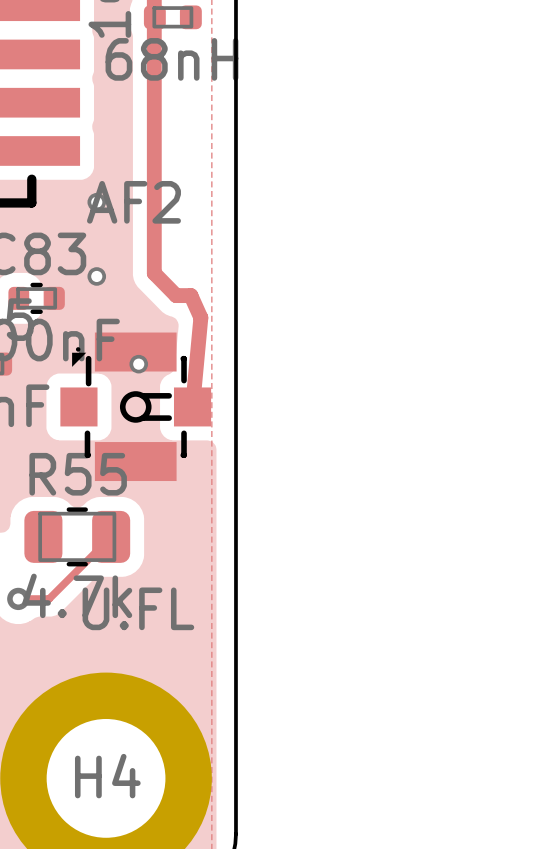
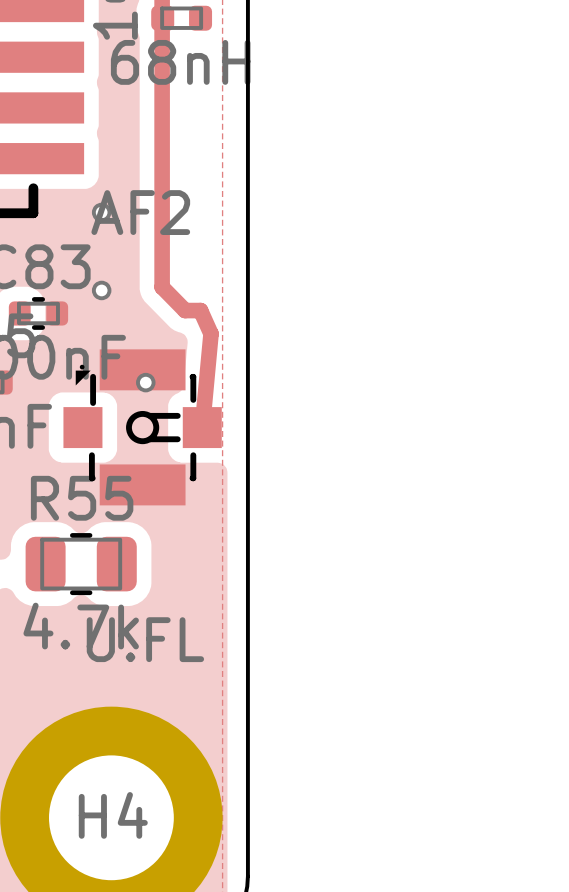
track: (111, 536) (49, 598) (18, 598) -> none
via: (18, 598) -> none

